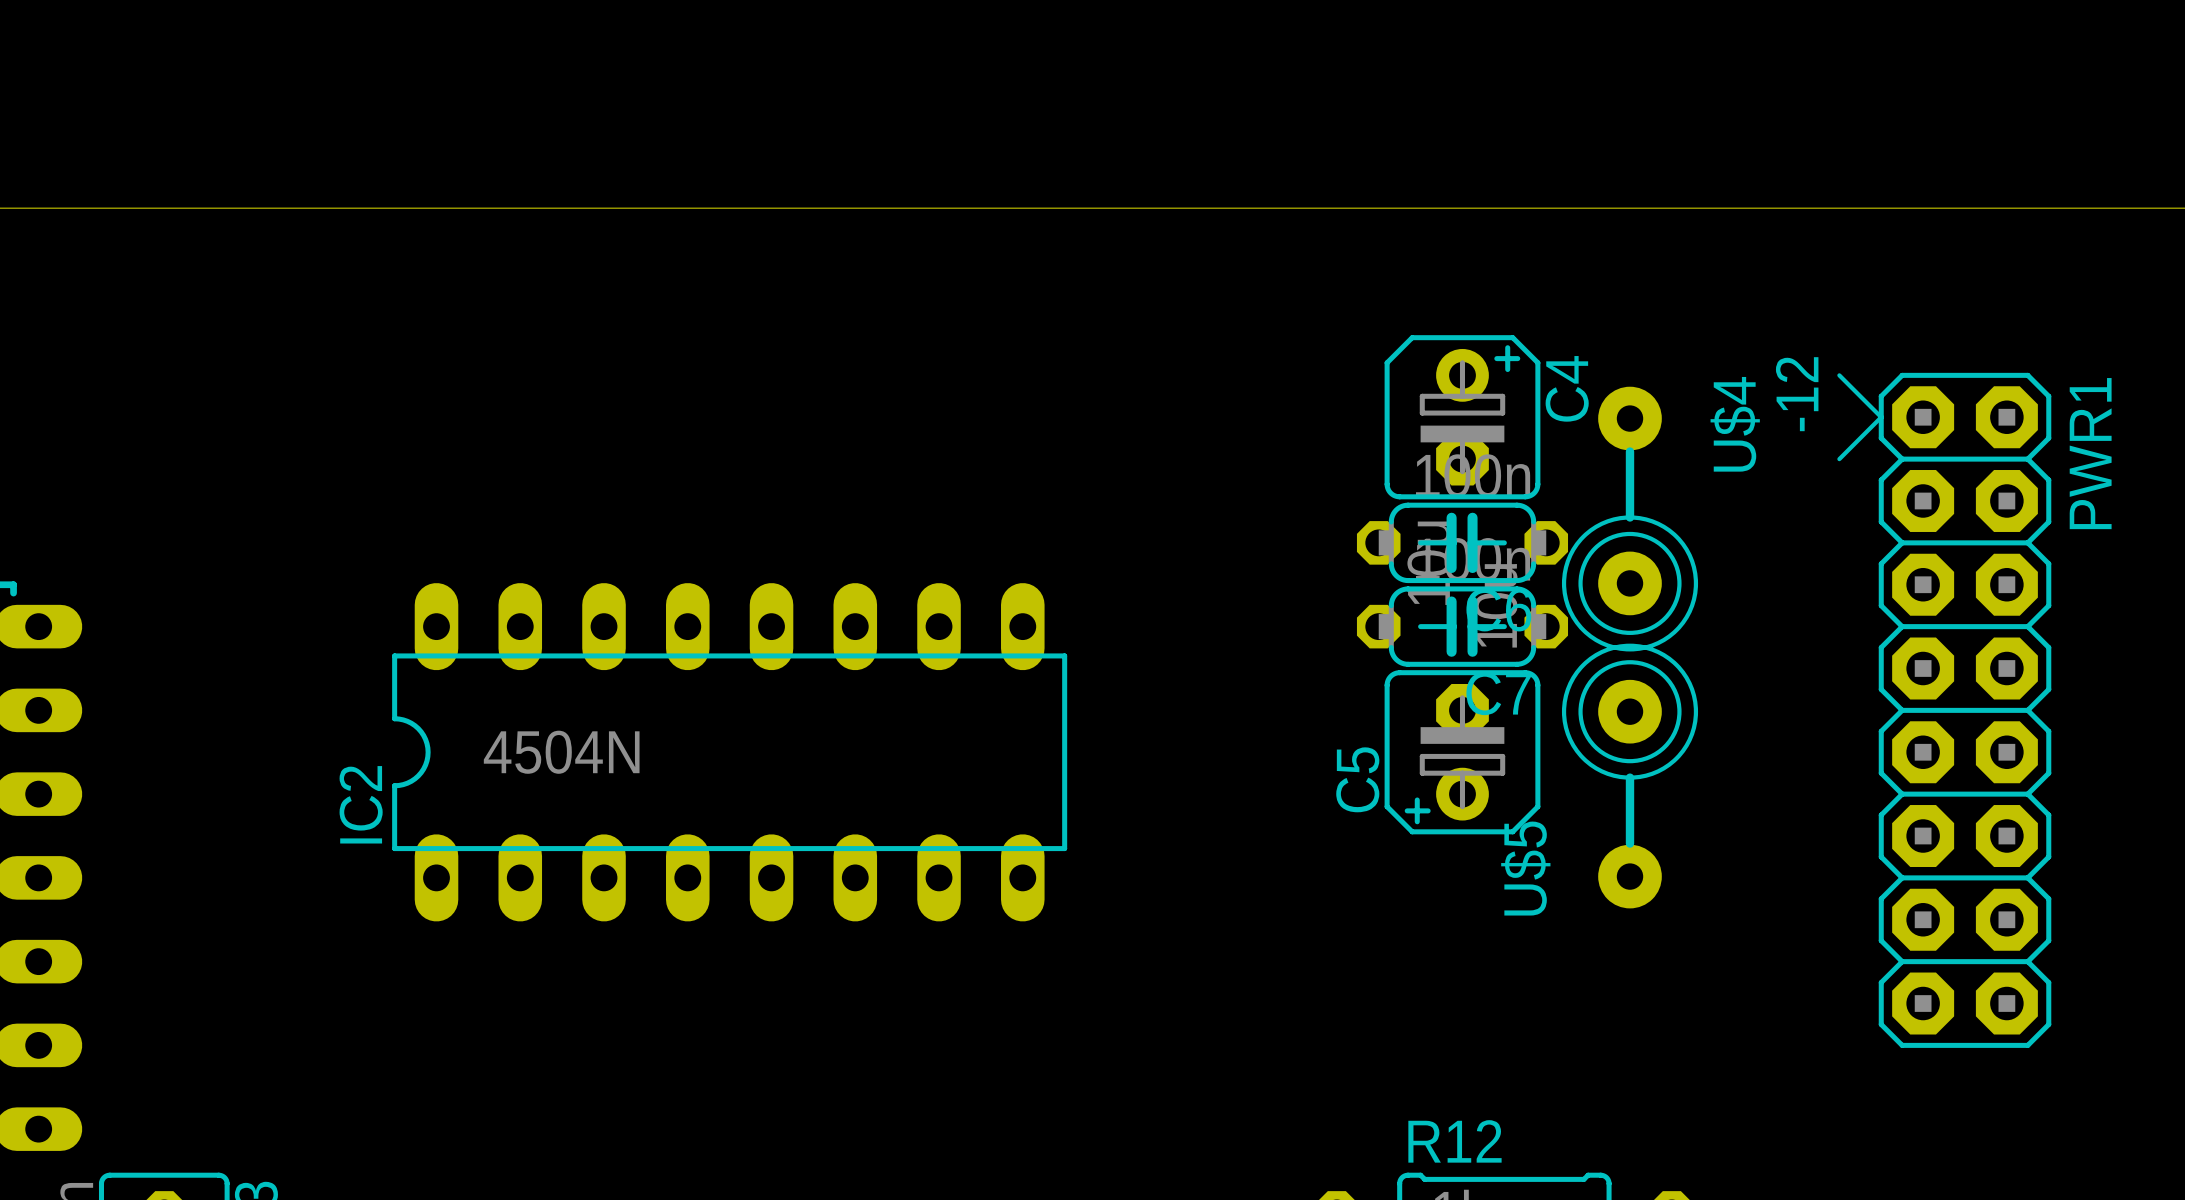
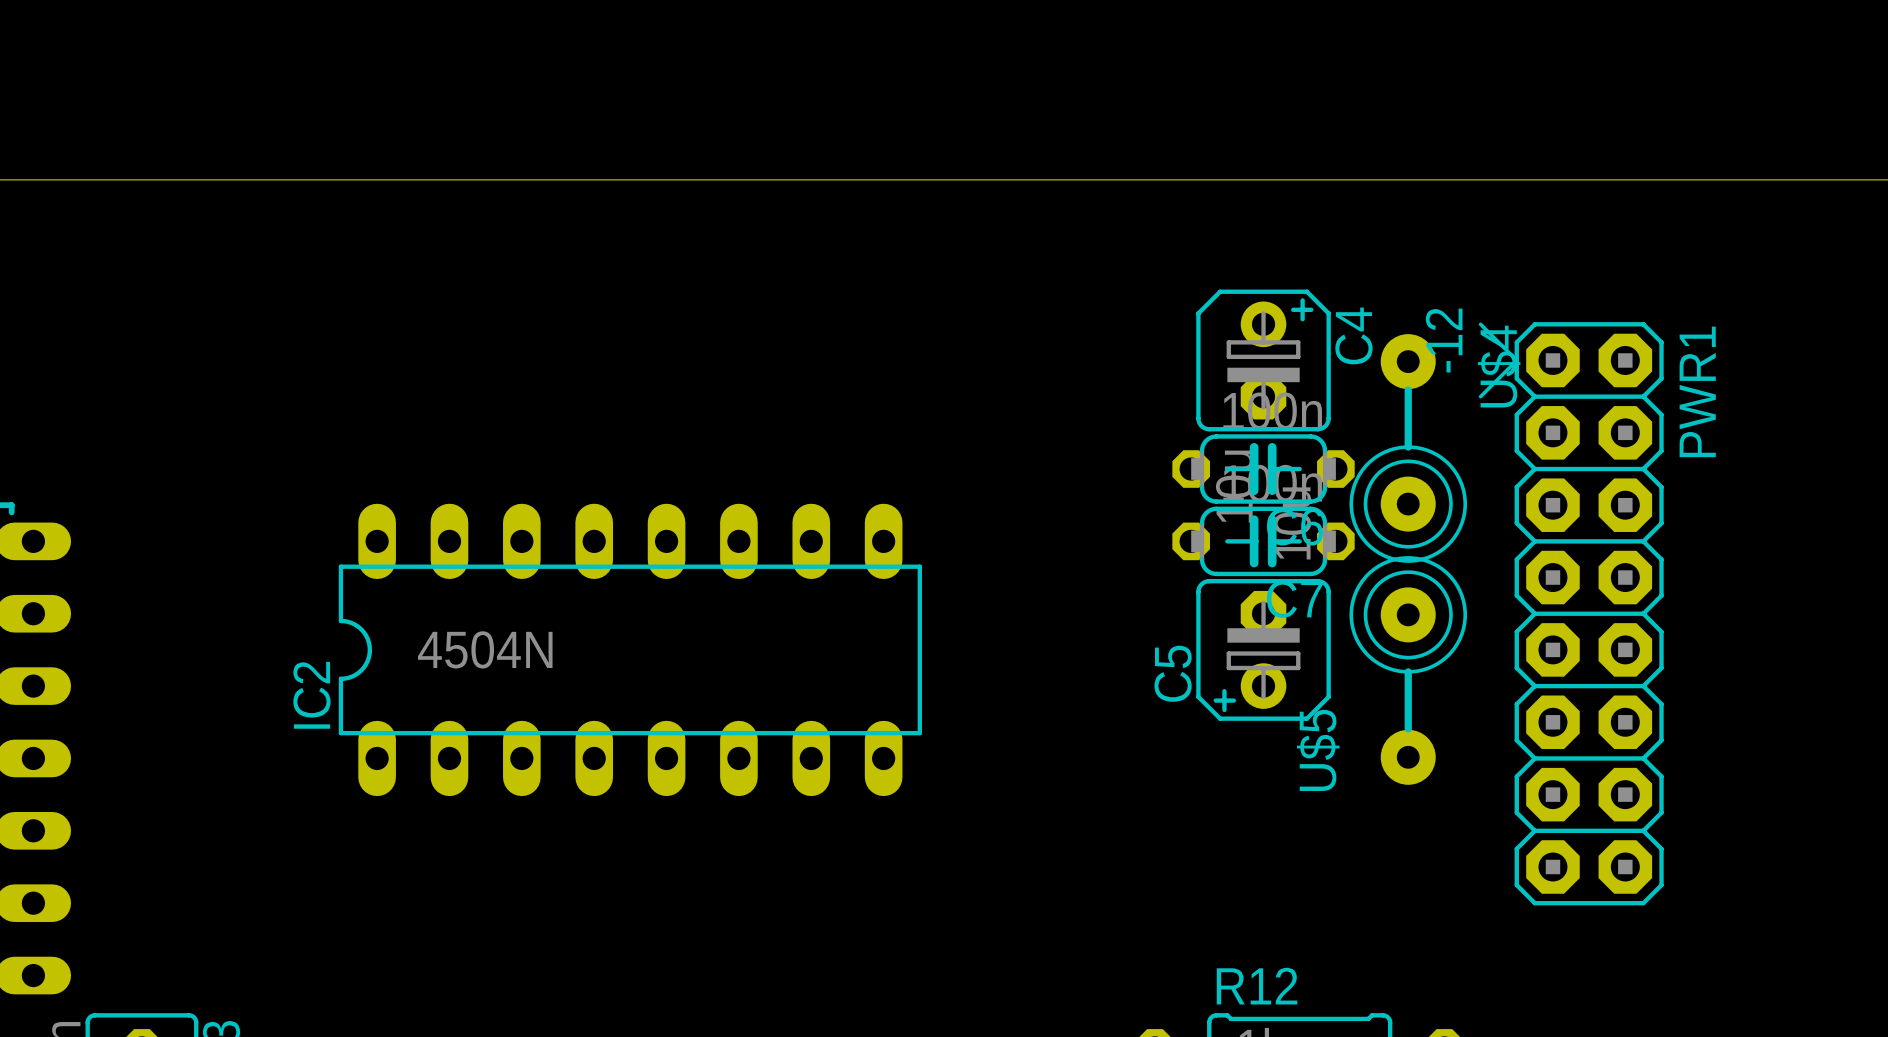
PWR1 position: (1944, 710) -> (1571, 613)

